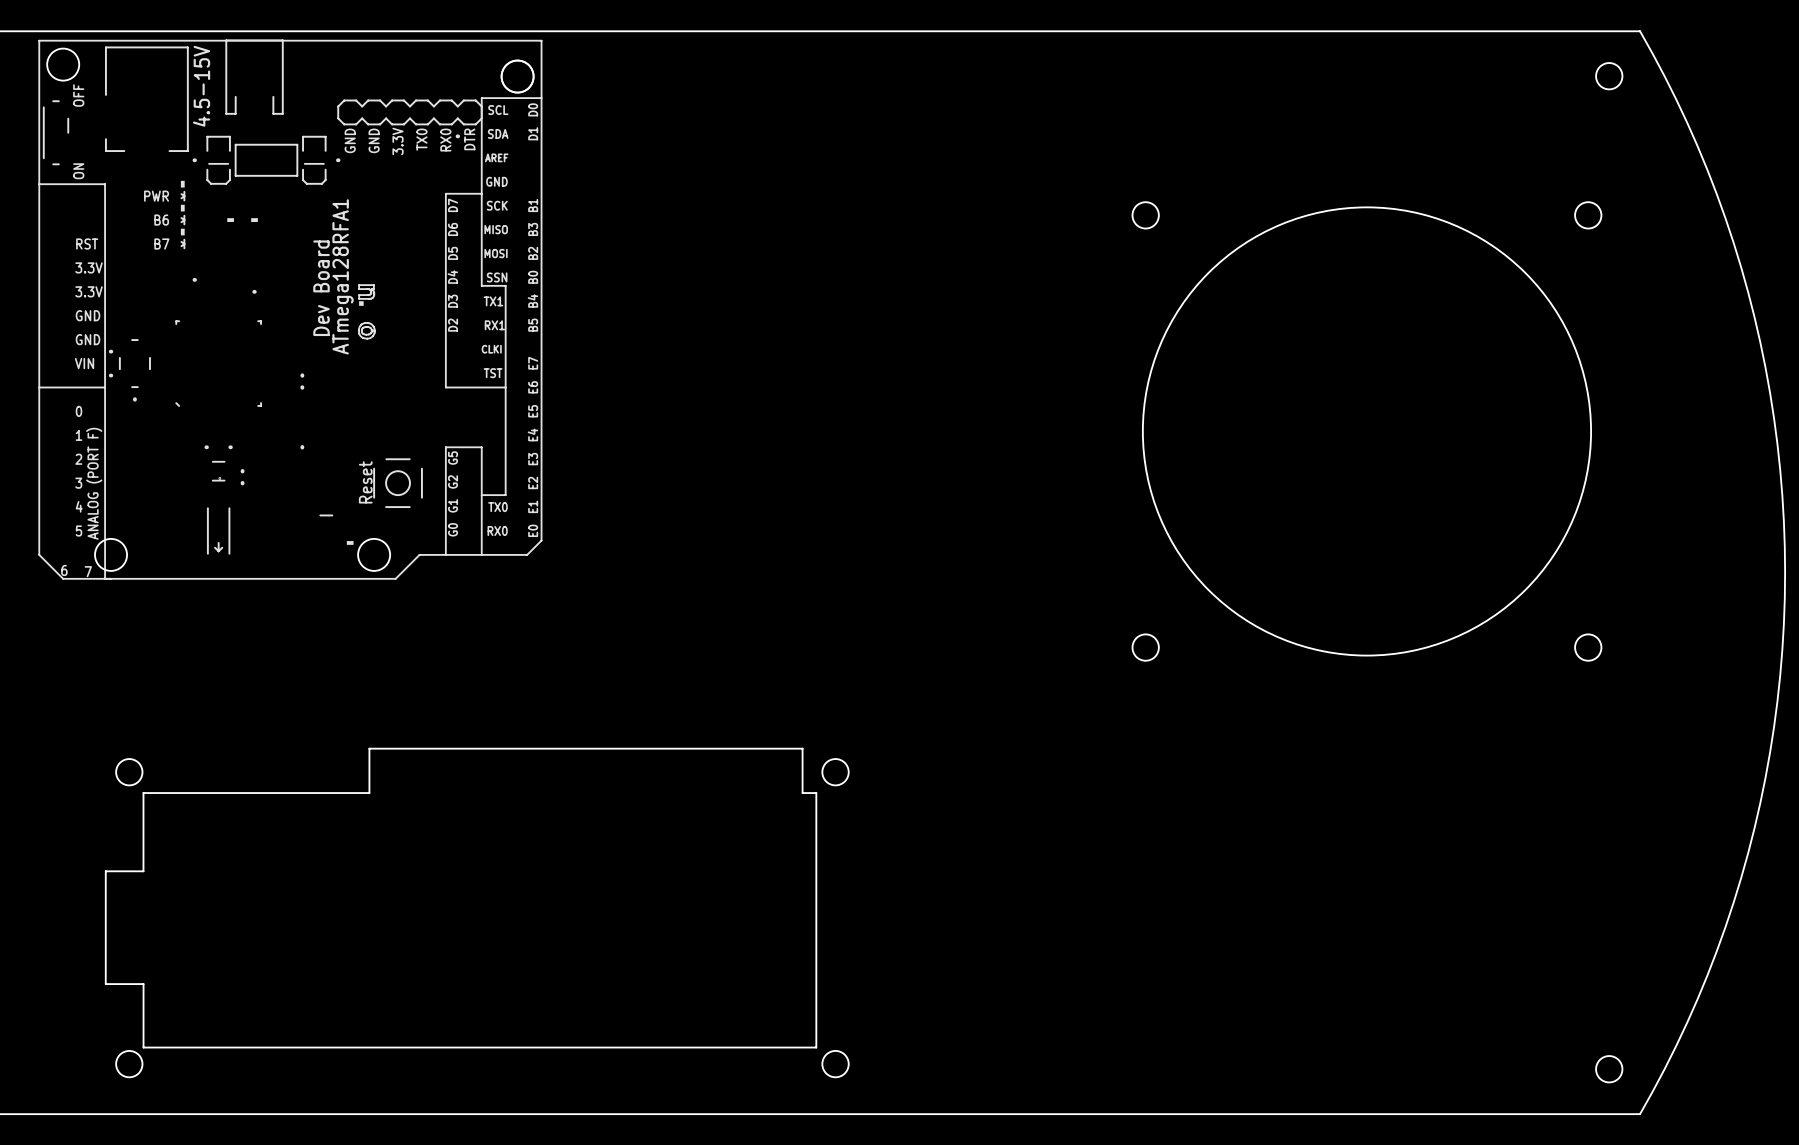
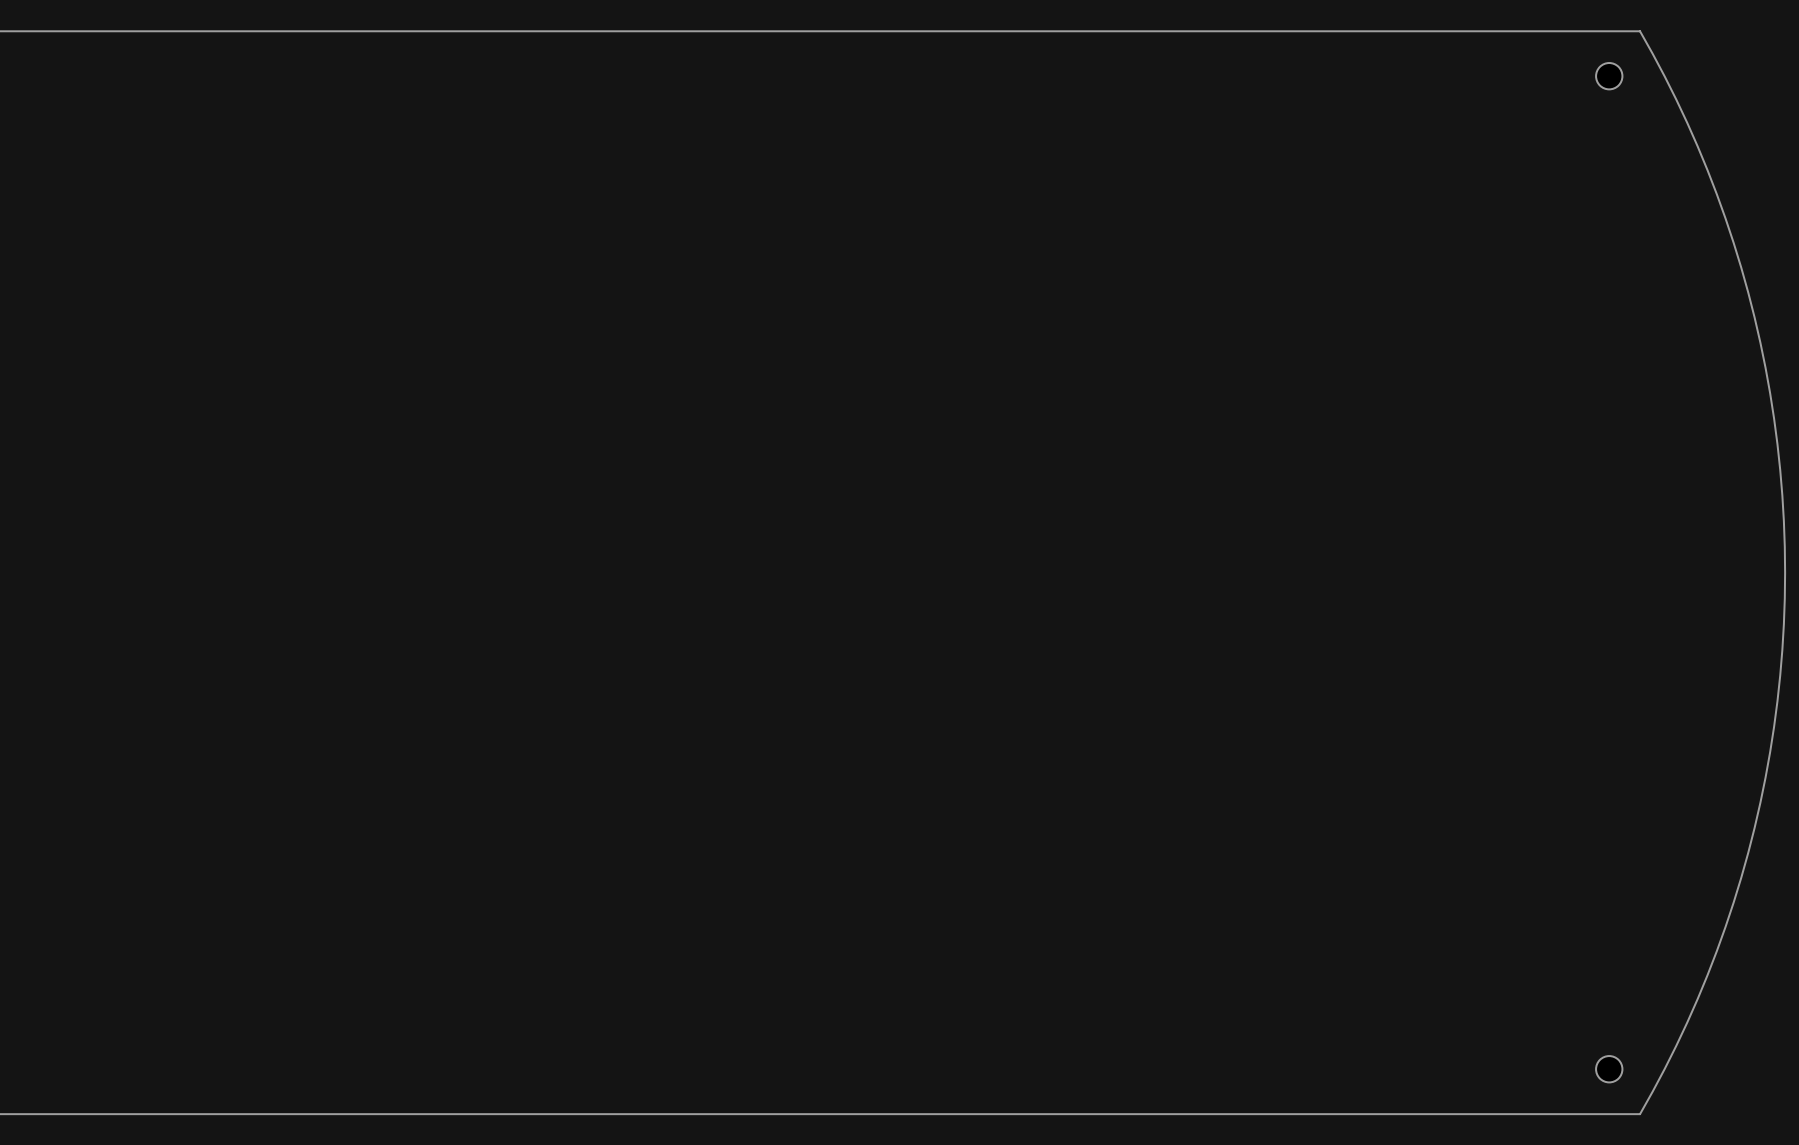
drawing: [38, 39, 543, 580] -> none
part: (1366, 431) -> none
part: (477, 912) -> none

